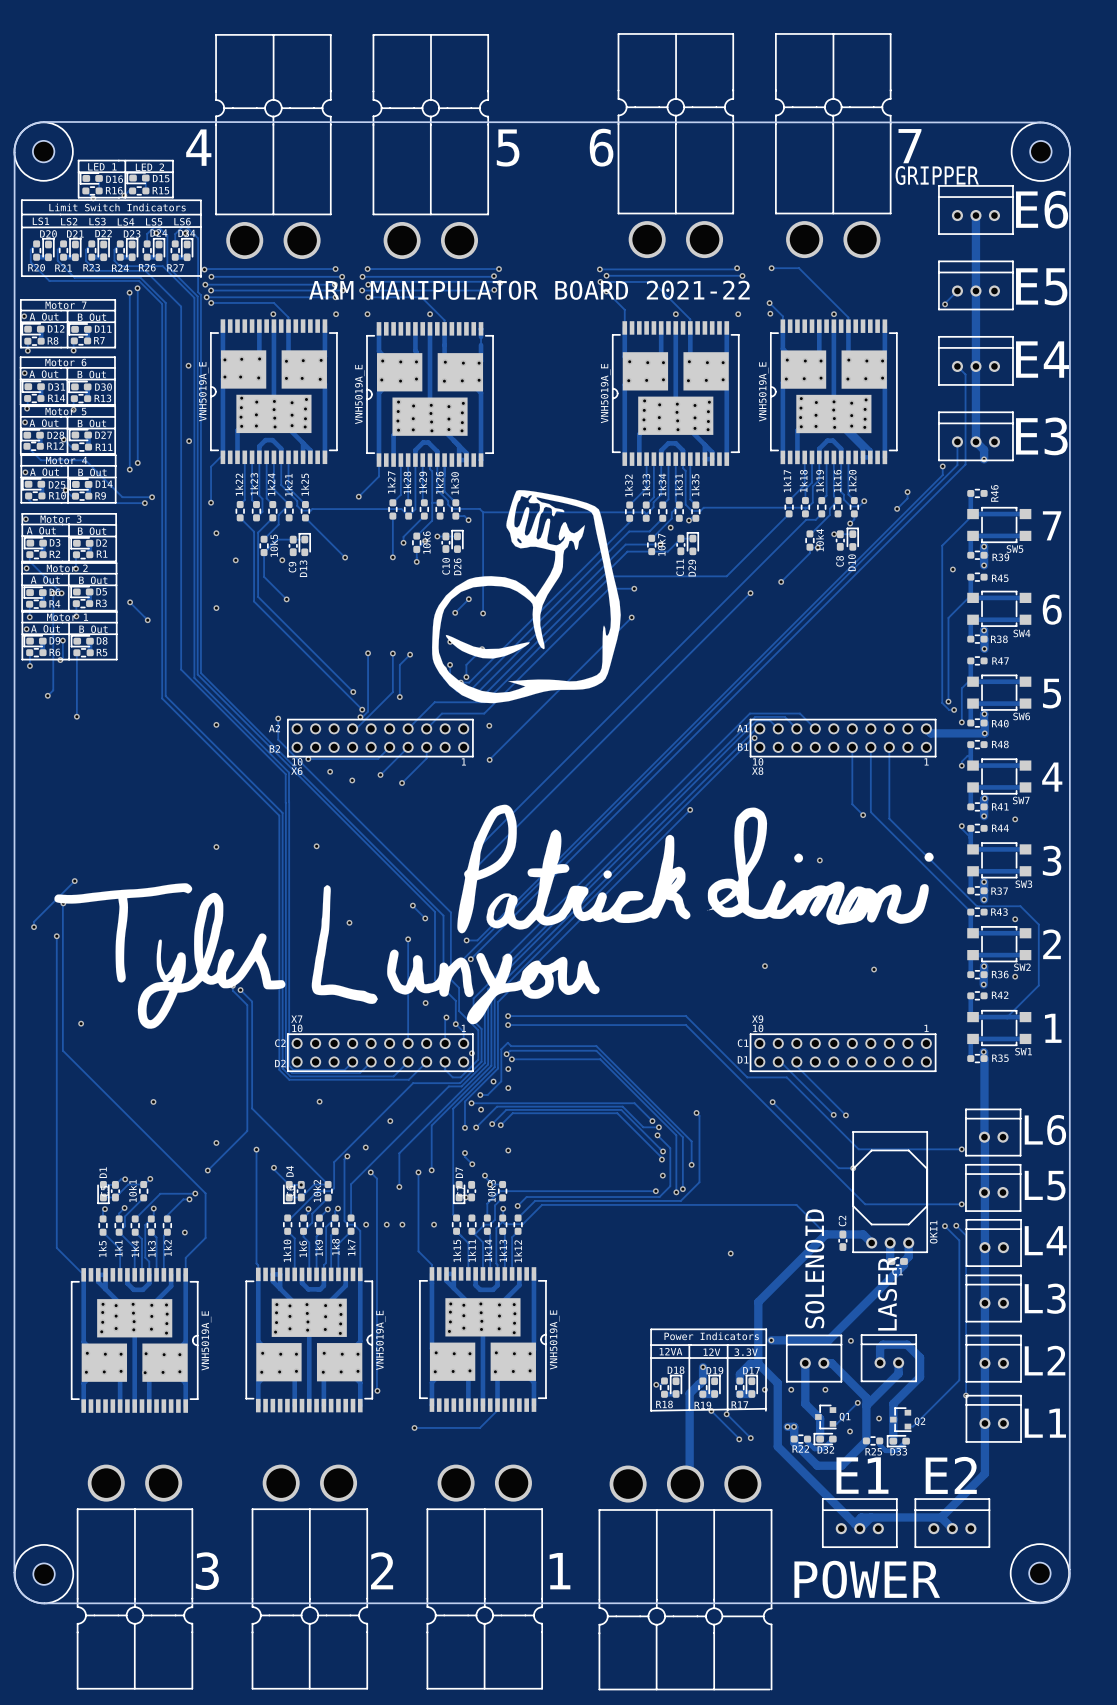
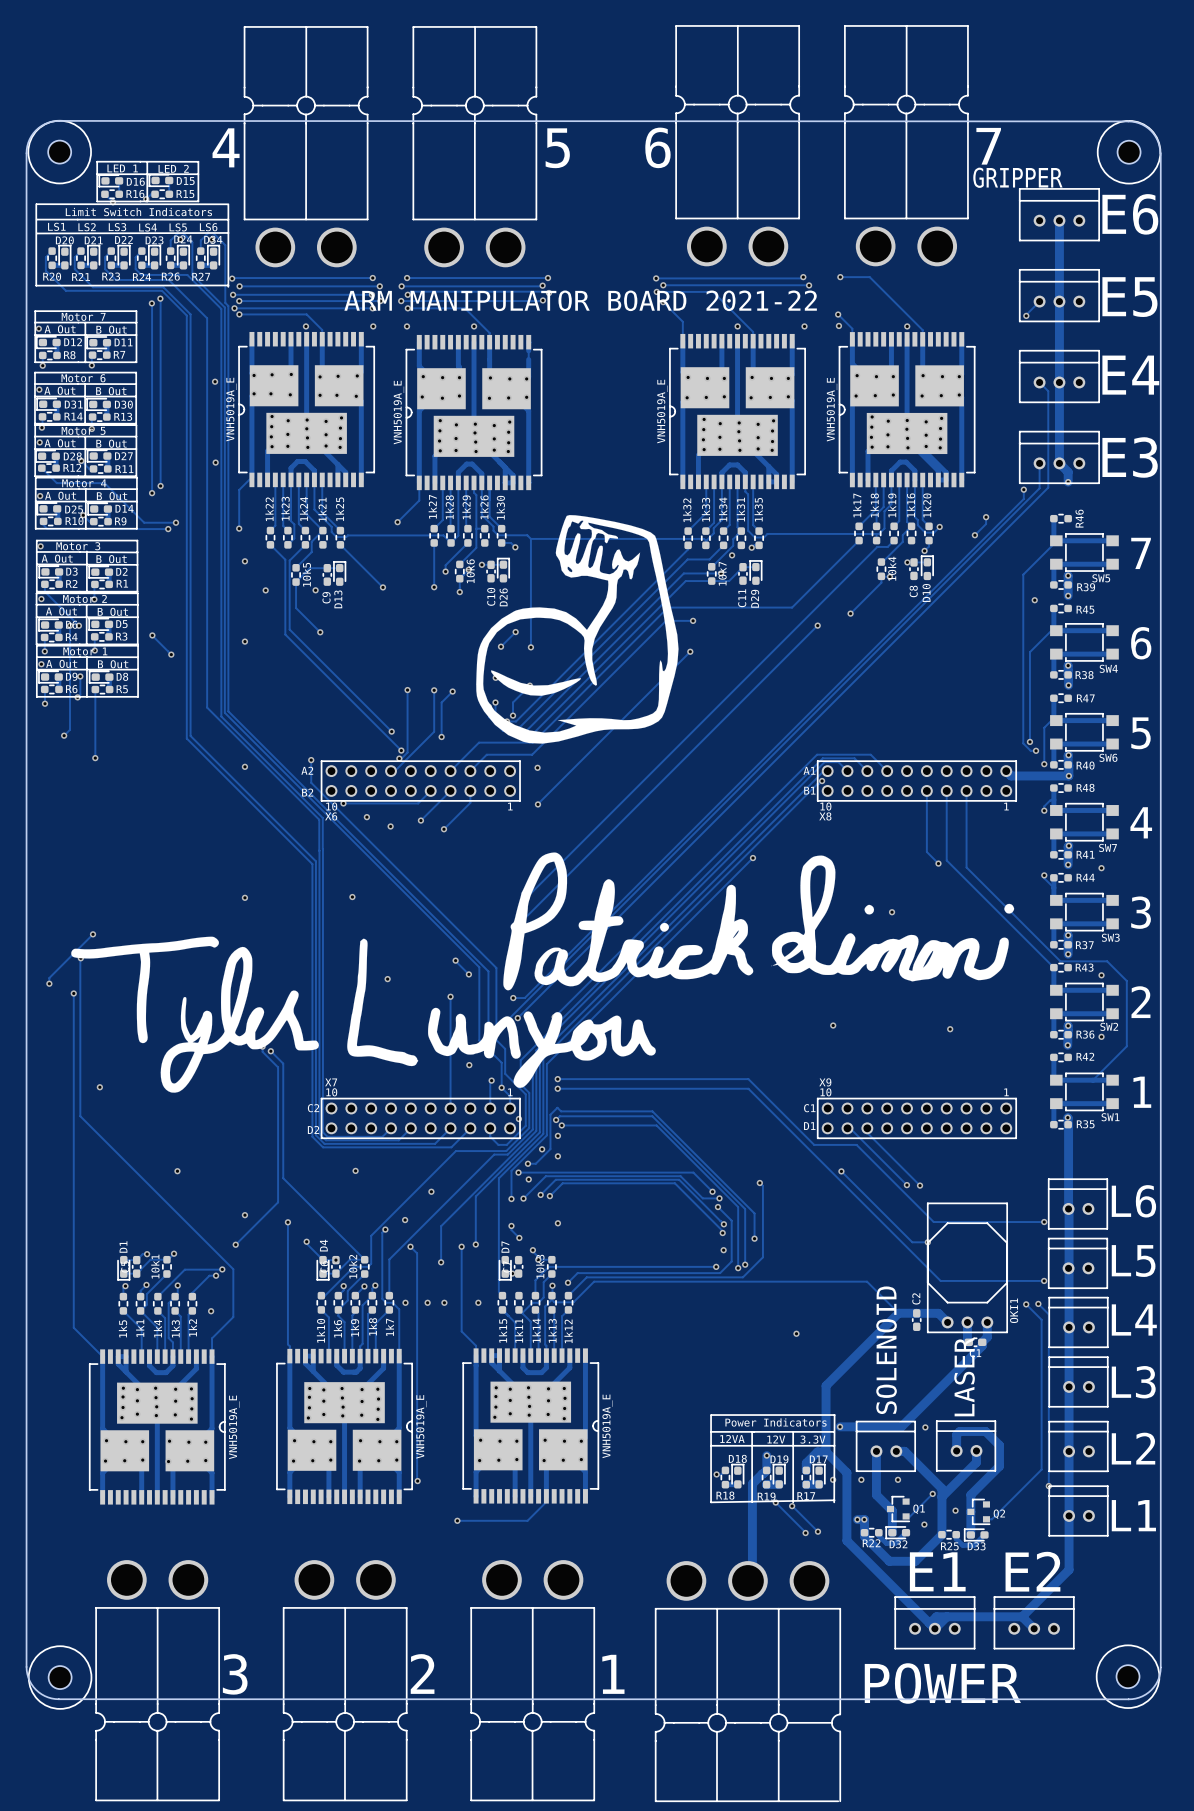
board edge: (44, 121) (1040, 122) (1054, 126) (1065, 136) (1069, 150) (1069, 1573) (1066, 1587) (1057, 1597) (1039, 1603) (44, 1603) (31, 1600) (20, 1591) (15, 1582) (14, 1572) (14, 152) (16, 142) (22, 131) (34, 123) (44, 121) -> none
board edge: none -> (1160, 153) (1158, 142) (1150, 130) (1142, 124) (1128, 121) (58, 120) (44, 124) (33, 133) (28, 142) (26, 153) (26, 1666) (29, 1680) (38, 1692) (48, 1697) (58, 1699) (1128, 1699) (1142, 1696) (1153, 1687) (1158, 1678) (1160, 1667) (1160, 153)

